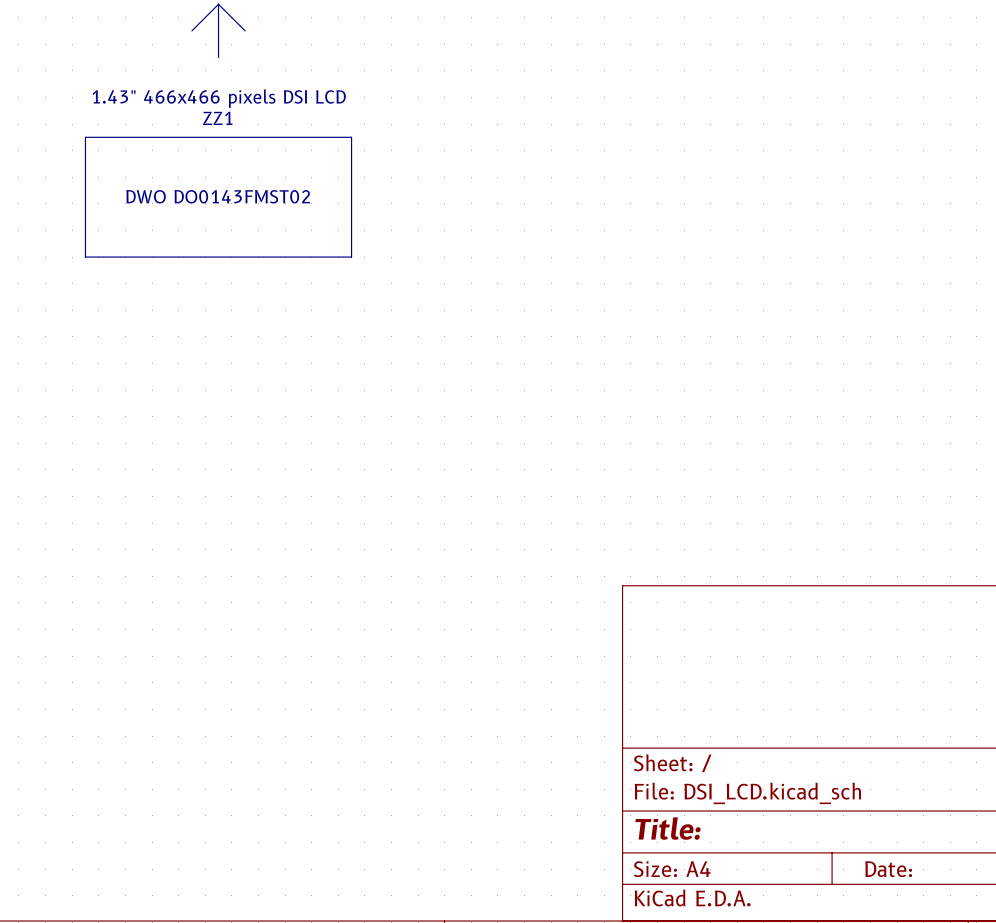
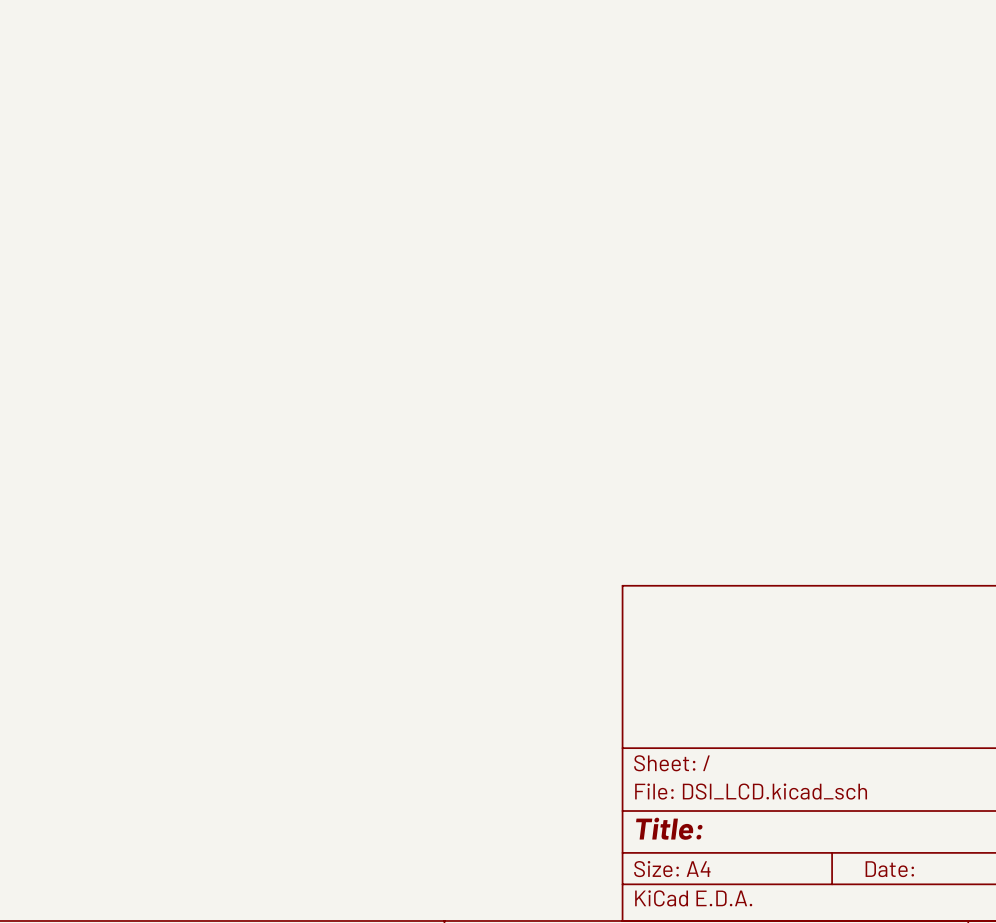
line: (218, 4) (245, 30) -> none
line: (218, 4) (218, 57) -> none
line: (218, 4) (191, 30) -> none
text: 1.43" 466x466 pixels DSI LCD (219, 98) -> none
text: ZZ1 (217, 118) -> none
line: (85, 137) (351, 137) (351, 257) (85, 257) (85, 137) -> none
text: DWO DO0143FMST02 (218, 196) -> none

